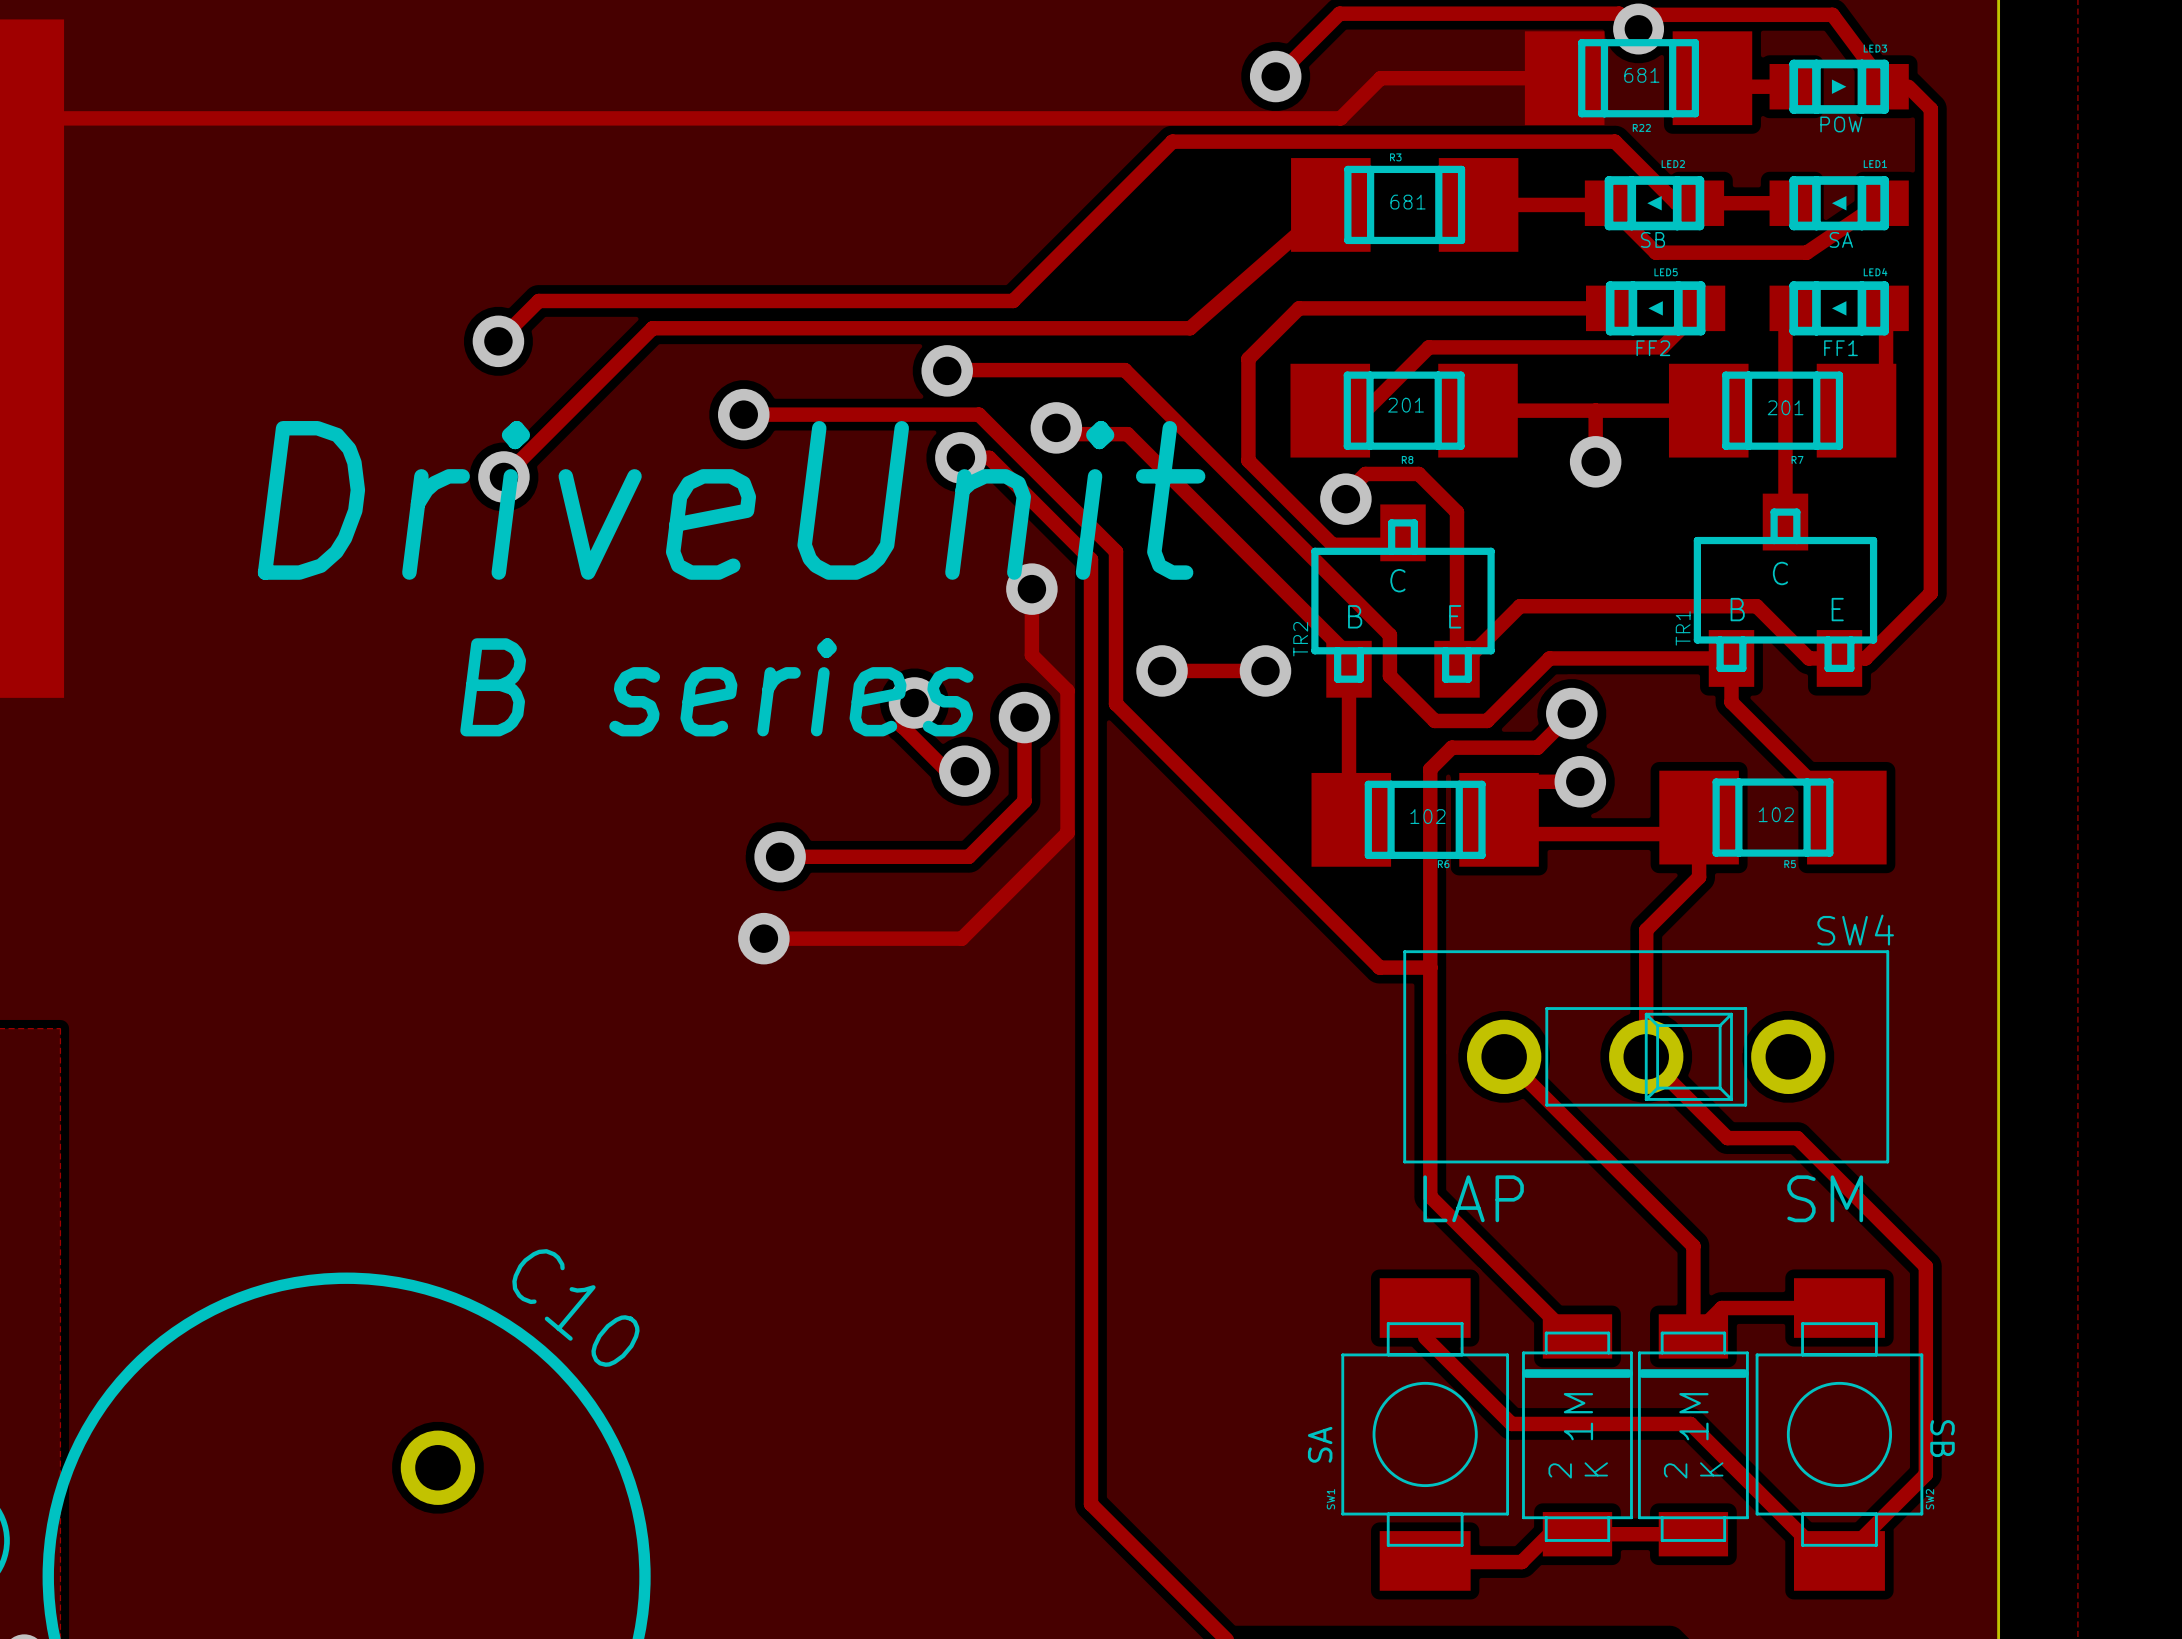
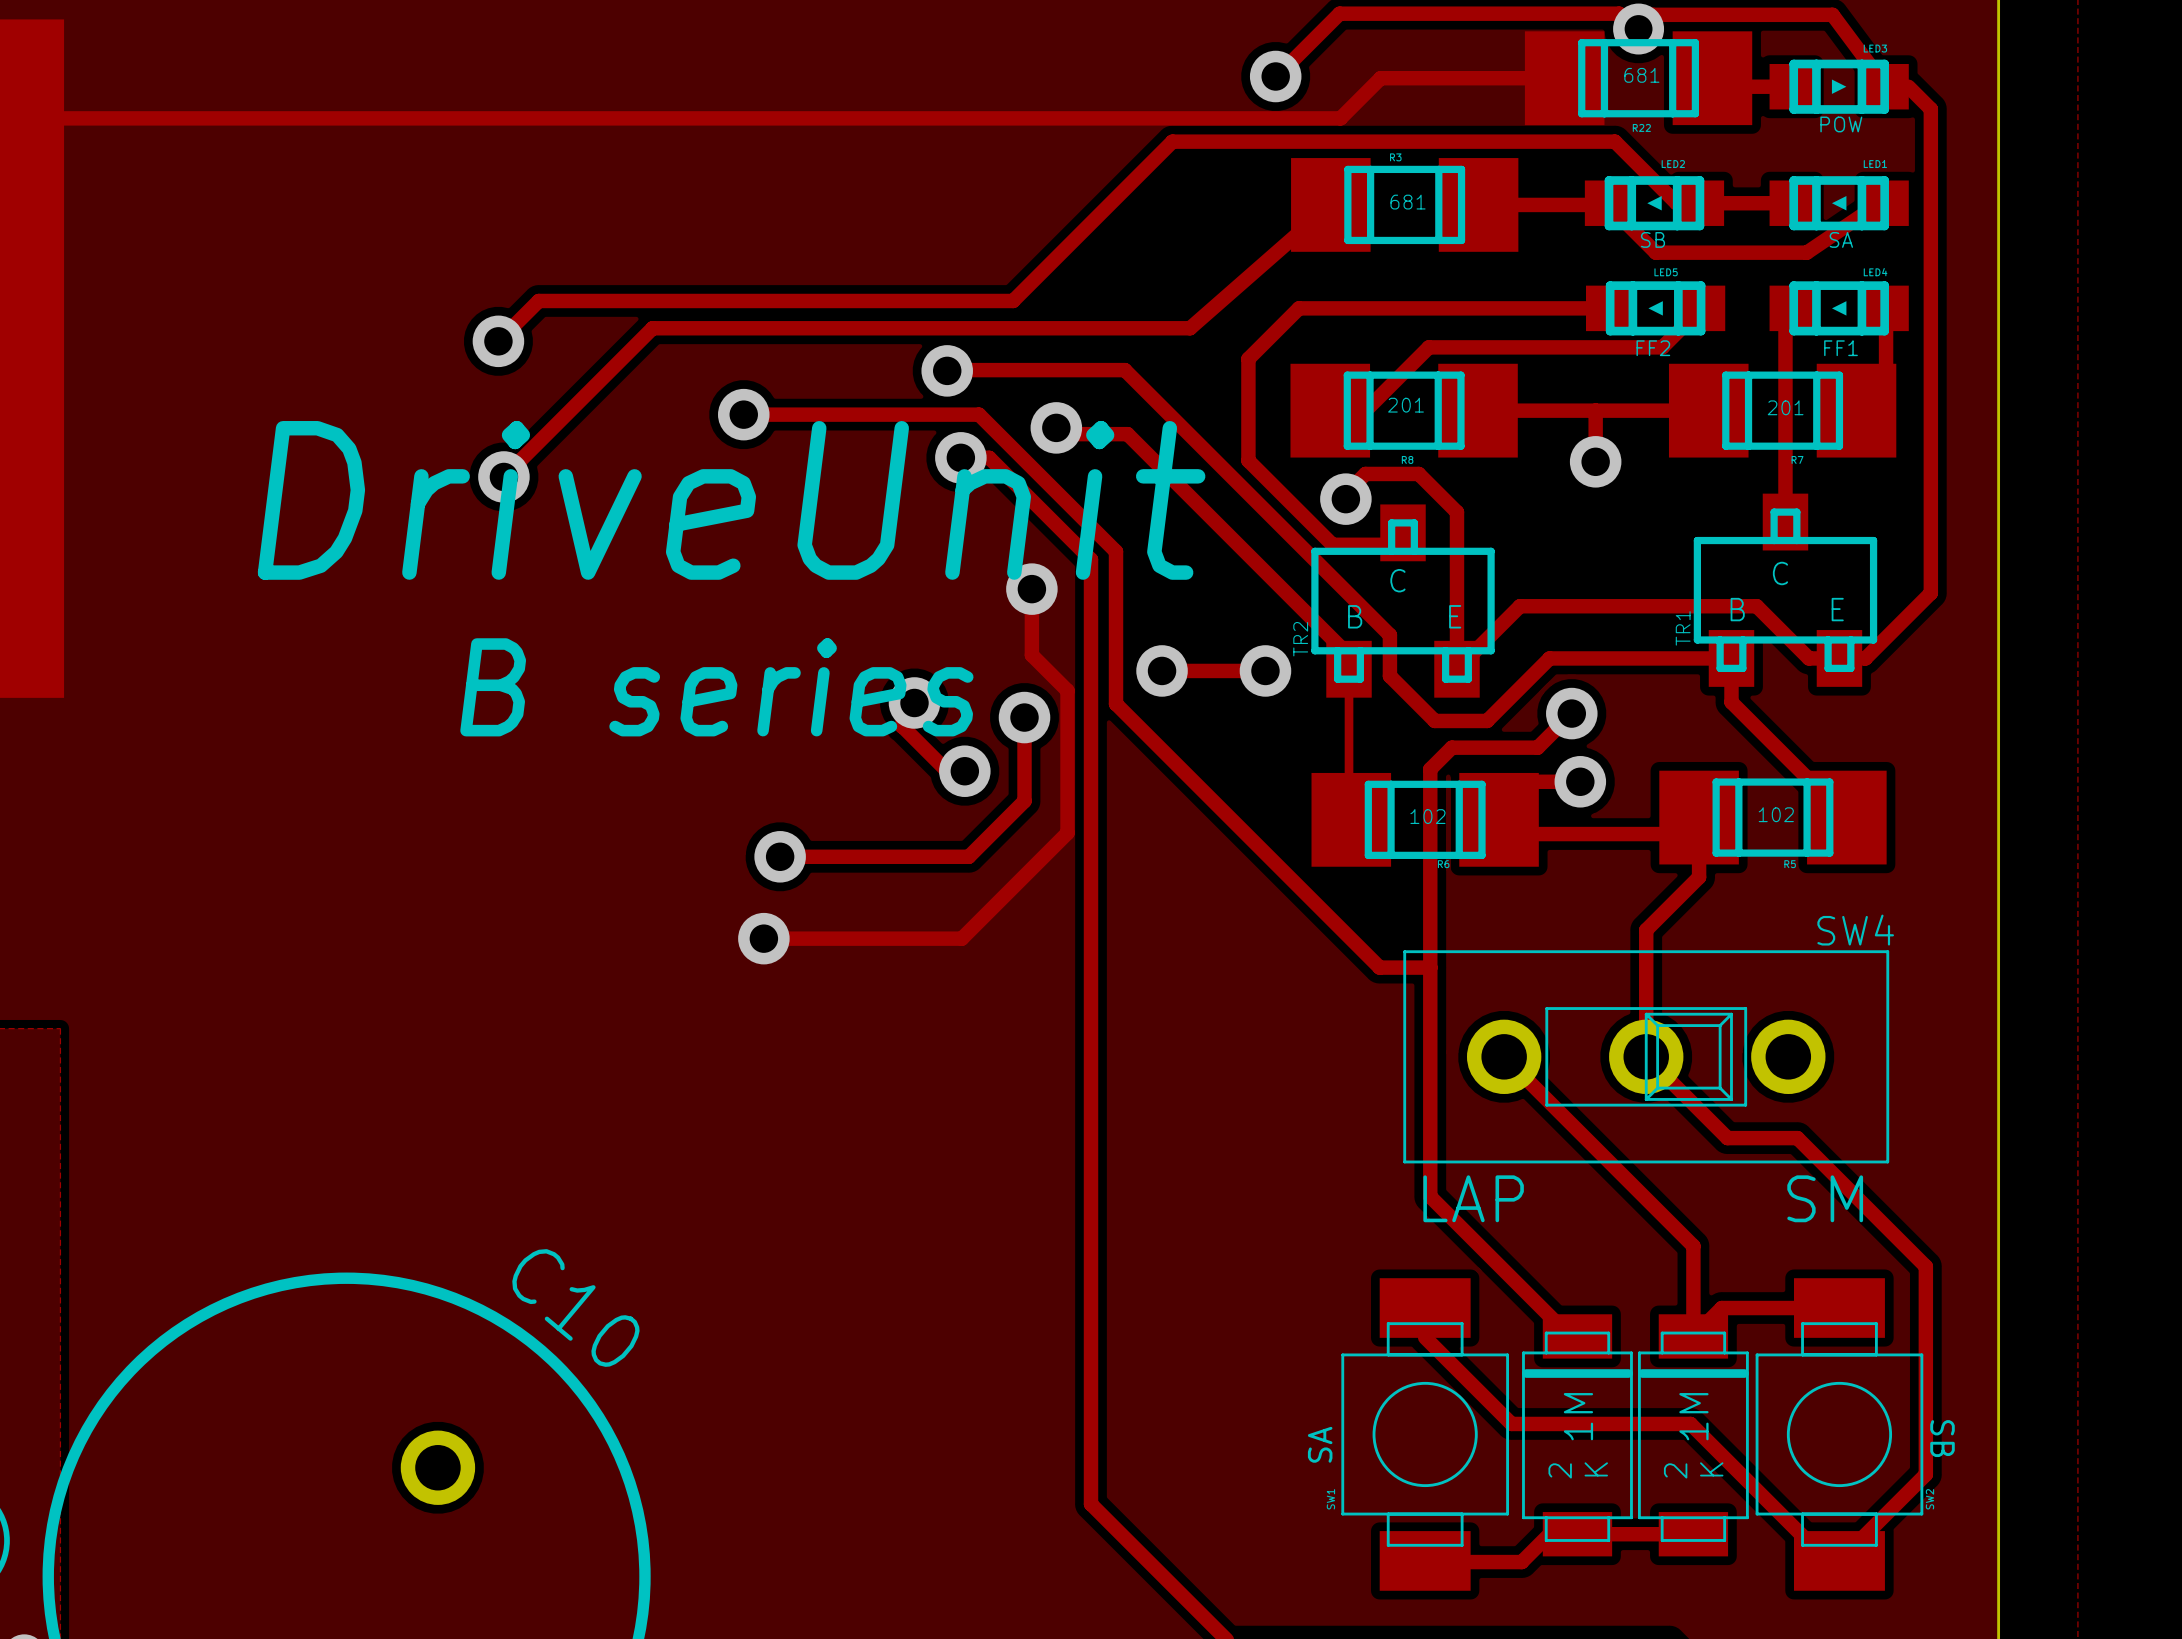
track width: thick (1349, 669) (1349, 817) -> thin (1349, 669) (1349, 817)

